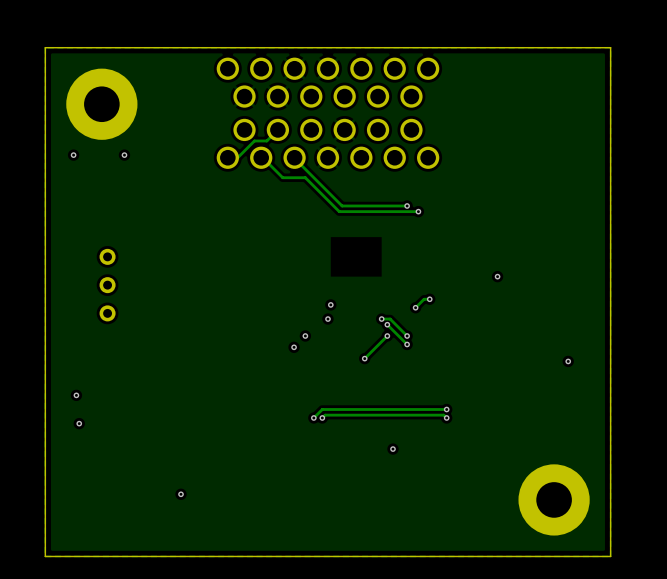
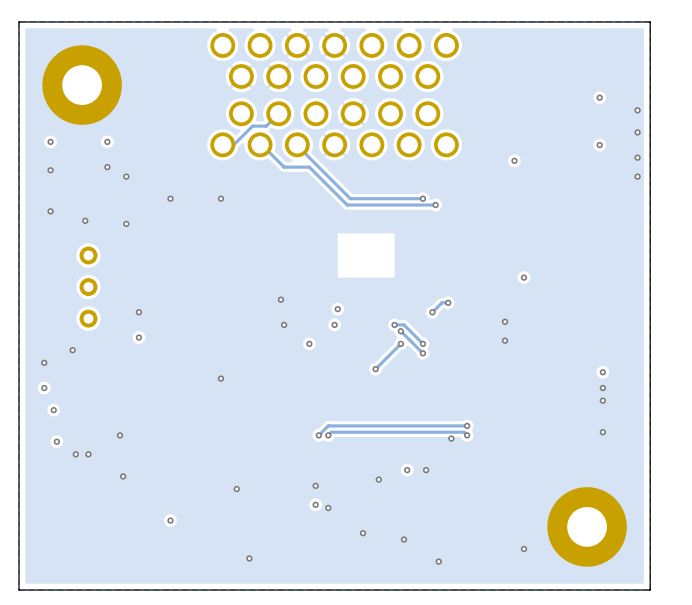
via: none -> (599, 97)
via: none -> (637, 110)
via: none -> (637, 132)
via: none -> (599, 145)
via: none -> (637, 157)
via: none -> (514, 160)
via: none -> (107, 167)
via: none -> (50, 170)
via: none -> (126, 176)
via: none -> (637, 176)
via: none -> (170, 198)
via: none -> (220, 198)
via: none -> (50, 211)
via: none -> (85, 220)
via: none -> (126, 223)
via: none -> (280, 299)
via: none -> (138, 312)
via: none -> (505, 321)
via: none -> (284, 324)
via: none -> (138, 337)
via: none -> (505, 340)
via: none -> (72, 350)
via: (294, 347) -> none
via: none -> (44, 362)
via: none -> (220, 378)
via: none -> (44, 388)
via: none -> (602, 388)
via: none -> (602, 400)
via: none -> (602, 432)
via: none -> (120, 435)
via: none -> (451, 438)
via: none -> (75, 454)
via: none -> (88, 454)
via: none -> (426, 470)
via: none -> (123, 476)
via: none -> (378, 479)
via: none -> (315, 485)
via: none -> (236, 489)
via: none -> (315, 504)
via: none -> (328, 507)
via: none -> (363, 533)
via: none -> (404, 539)
via: none -> (523, 549)
via: none -> (249, 558)
via: none -> (438, 561)

